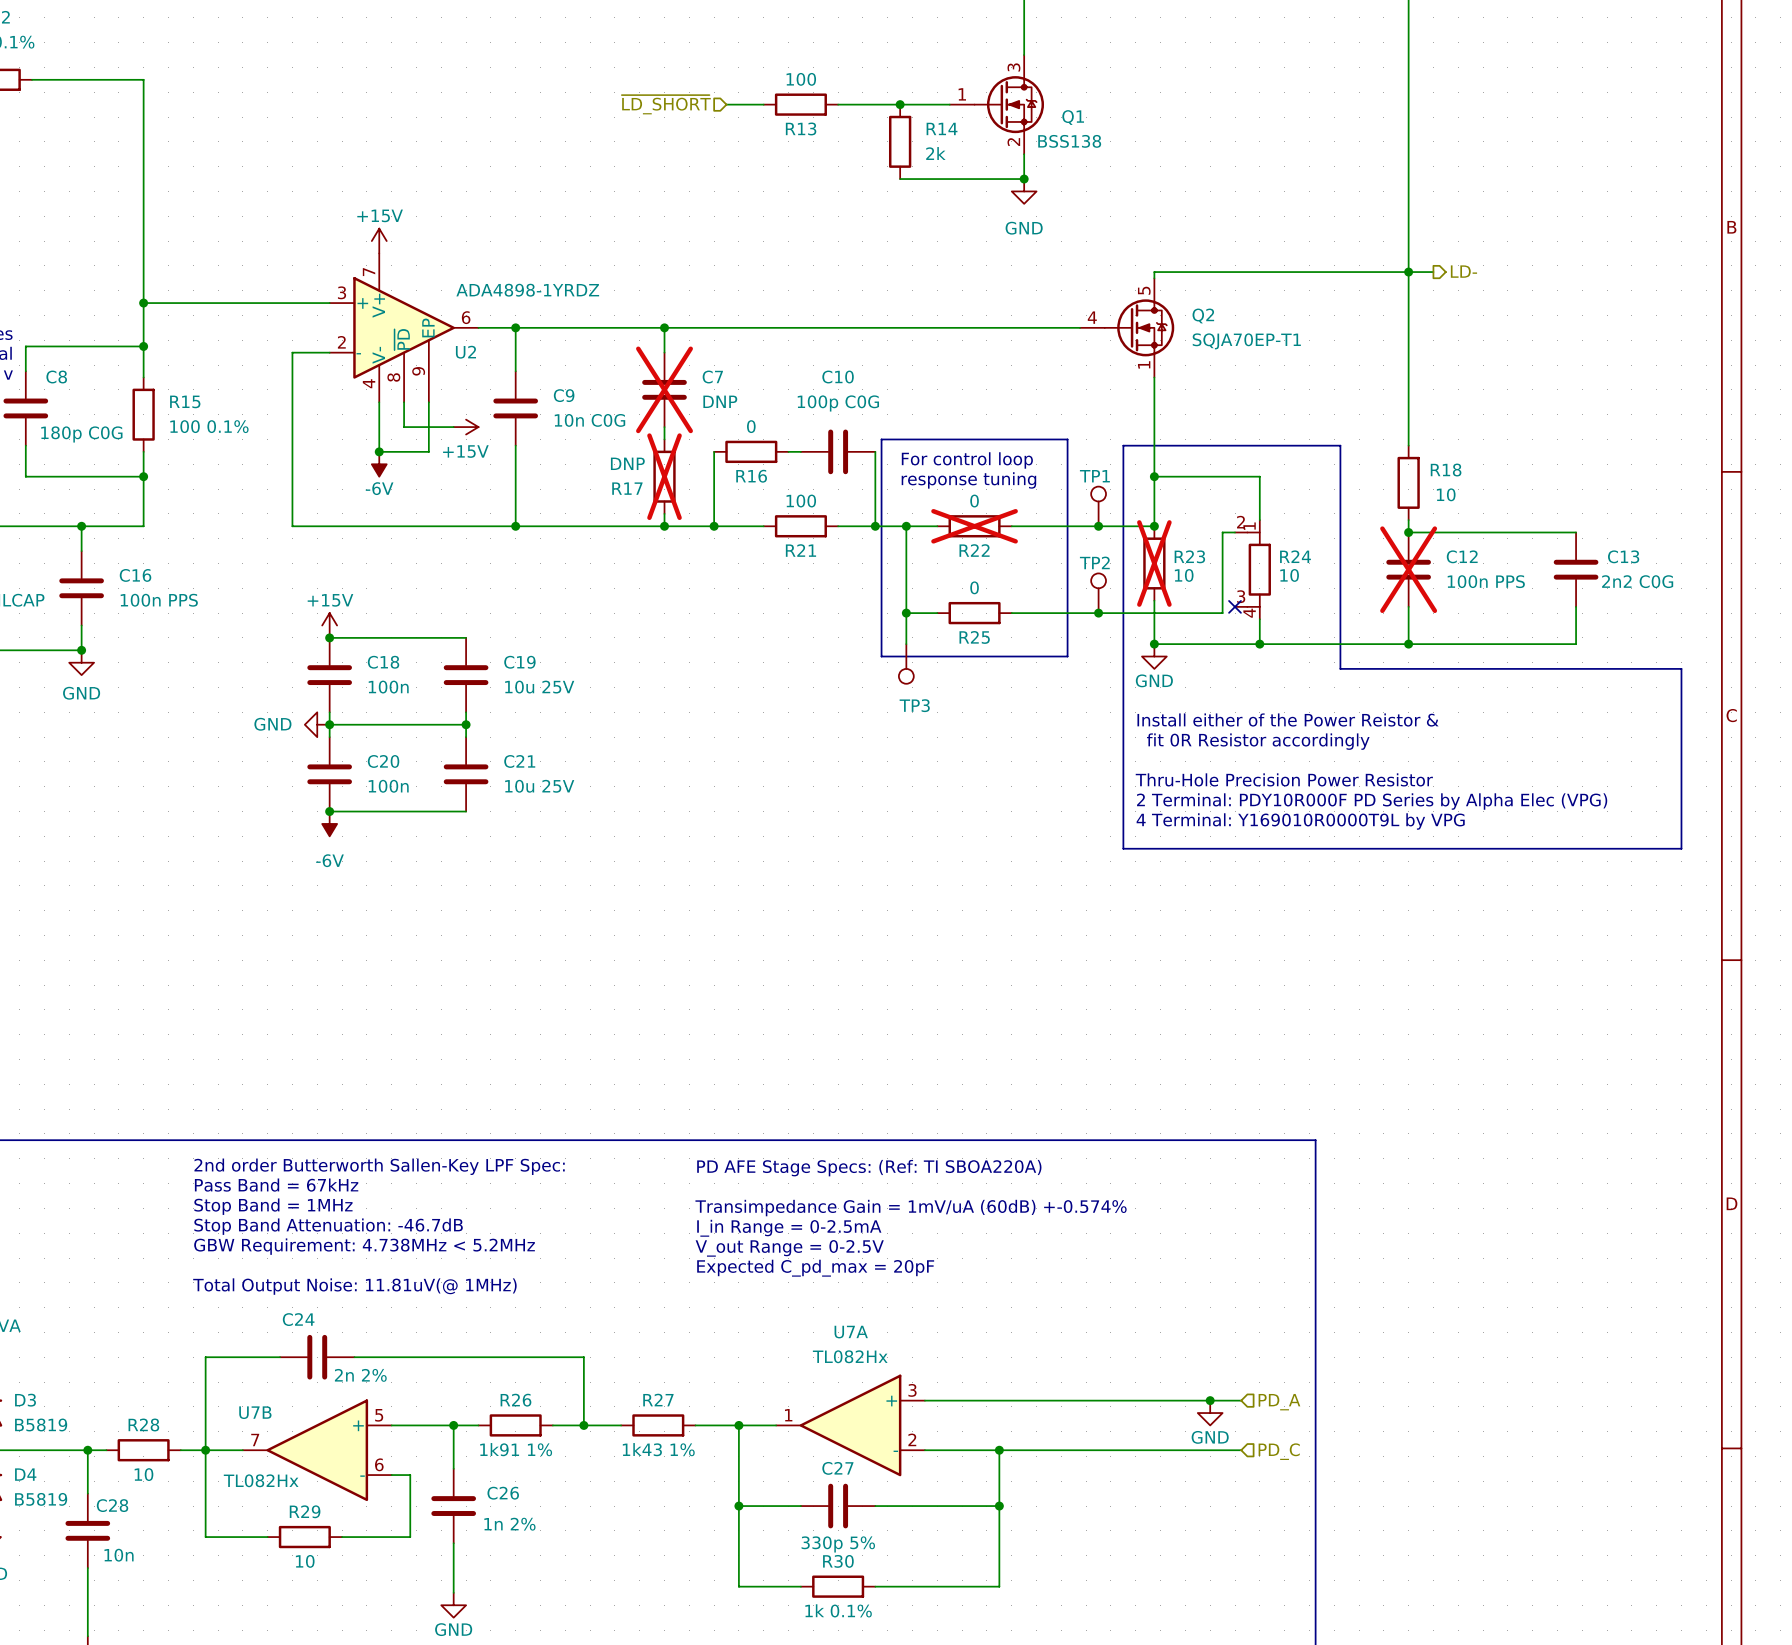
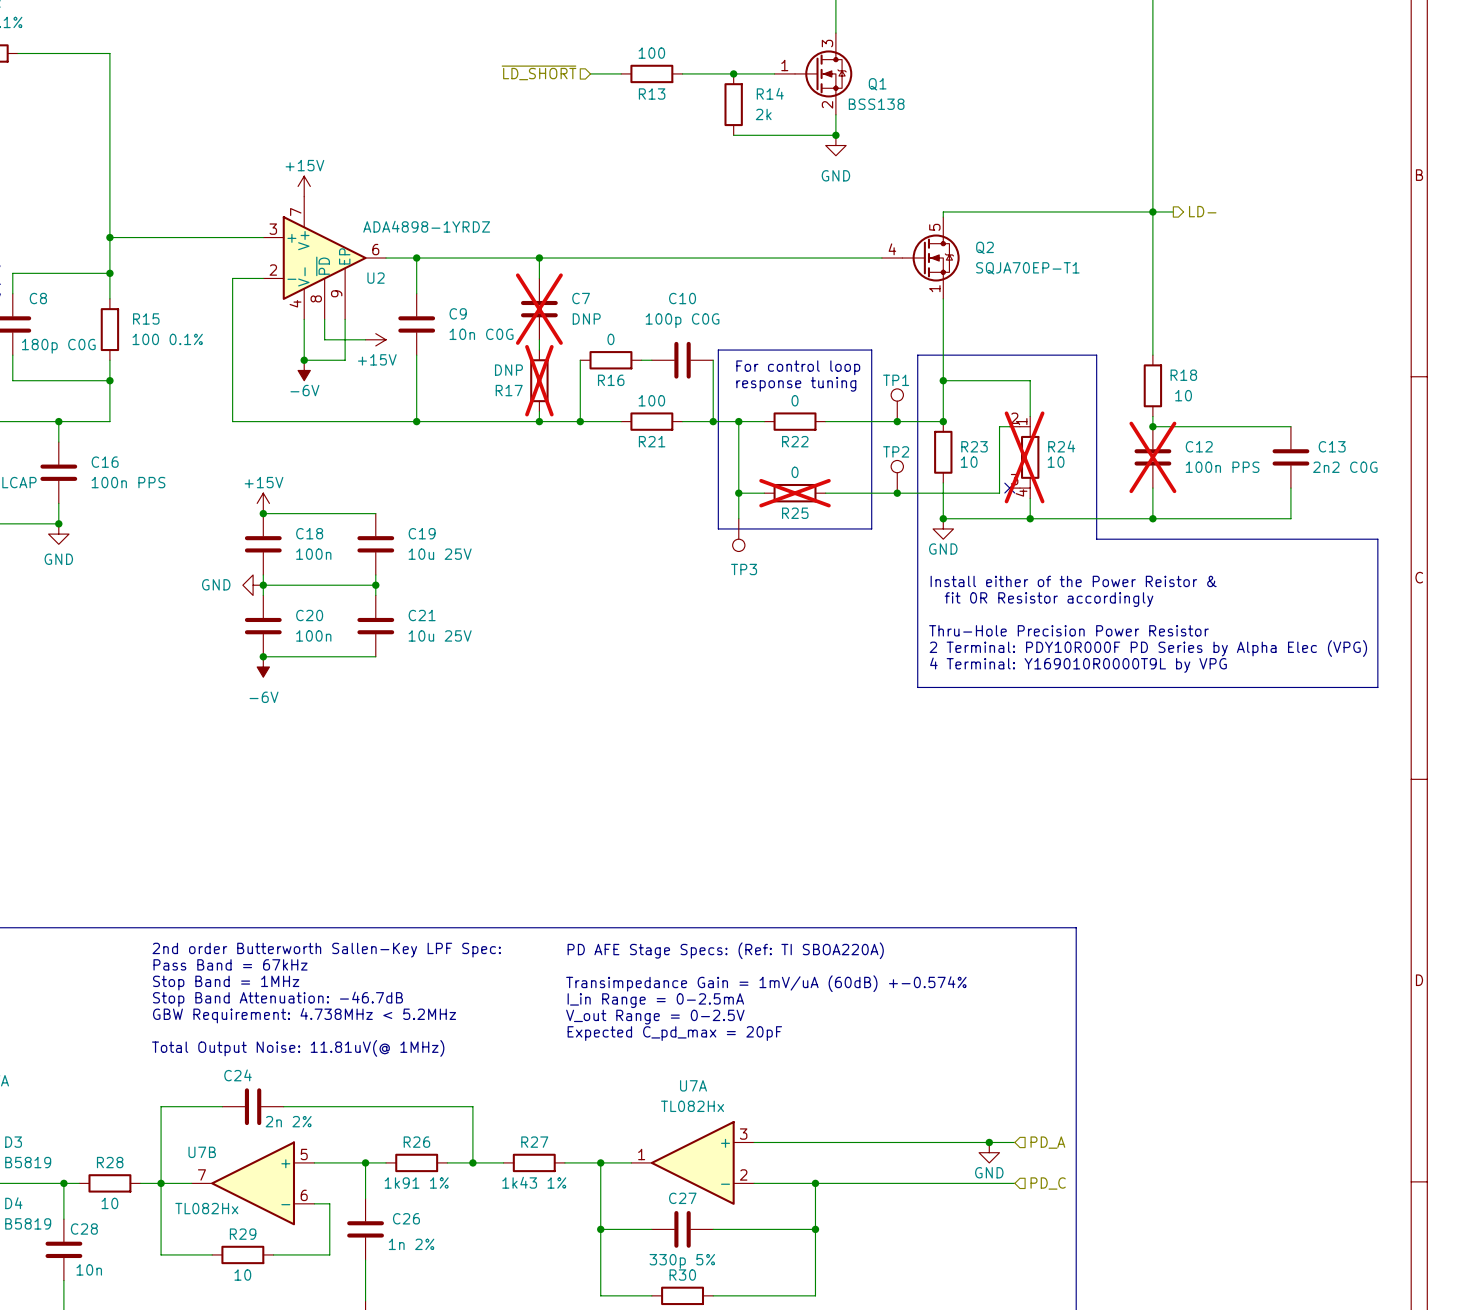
R22 do-not-place cross: (974, 526) -> none
R23 do-not-place cross: (1154, 563) -> none
R24 do-not-place cross: none -> (1024, 457)
R25 do-not-place cross: none -> (795, 493)

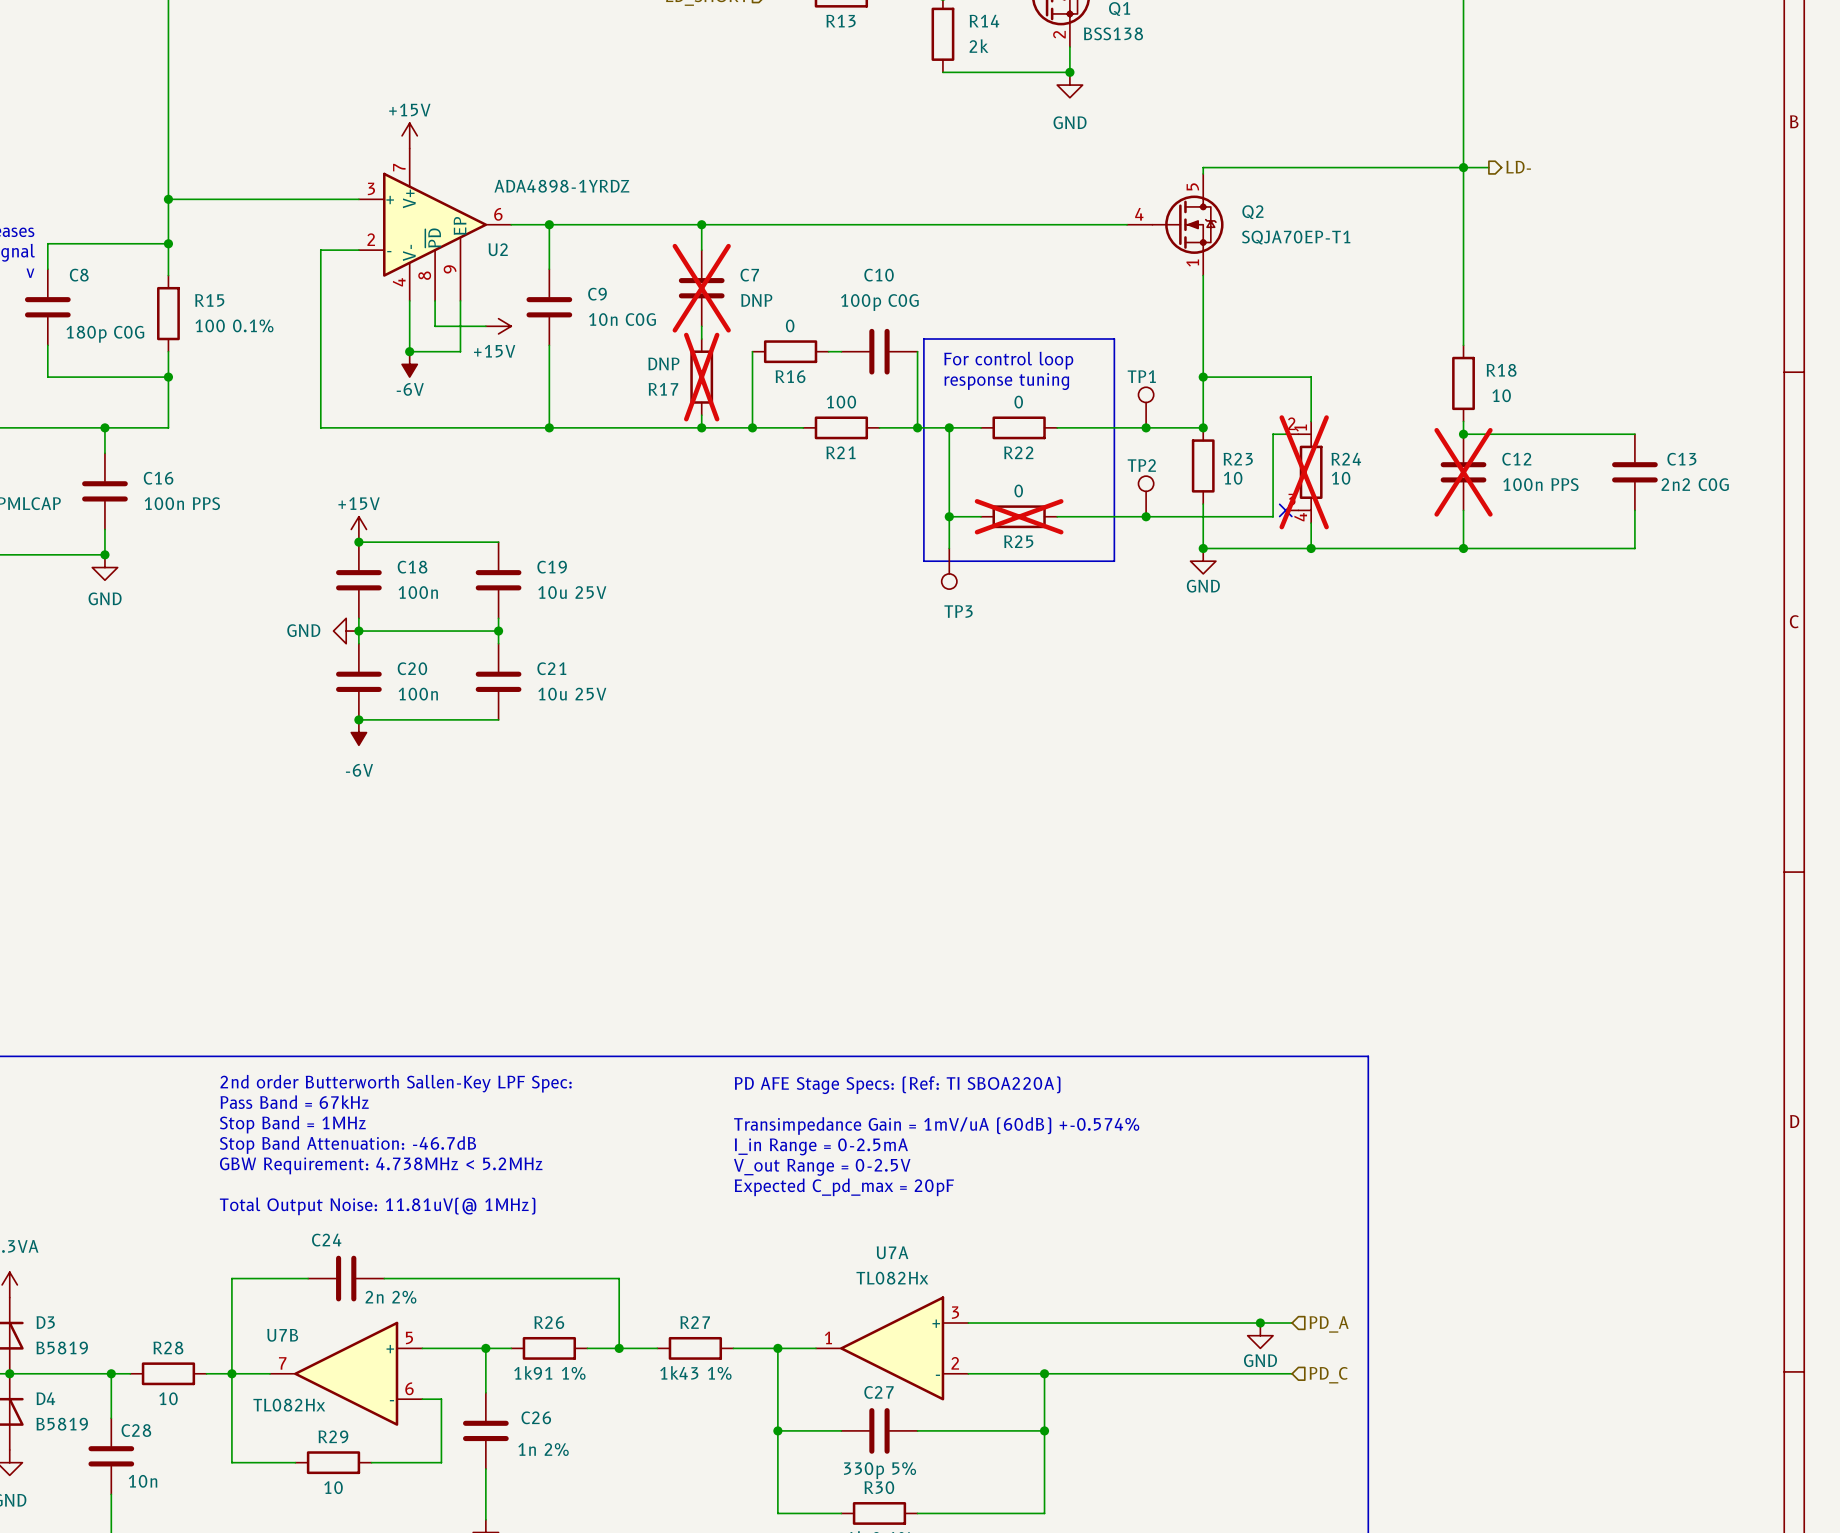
line: (917, 355) (917, 687) (1377, 687) (1377, 539) (1096, 539) (1096, 355) (917, 355) -> none
text: Install either of the Power Reistor & (1073, 581) -> none
text: fit 0R Resistor accordingly (1049, 599) -> none
text: Thru-Hole Precision Power Resistor (1068, 630) -> none
text: 2 Terminal: PDY10R000F PD Series by Alpha Elec (VPG) (1148, 648) -> none
text: 4 Terminal: Y169010R0000T9L by VPG (1078, 665) -> none

